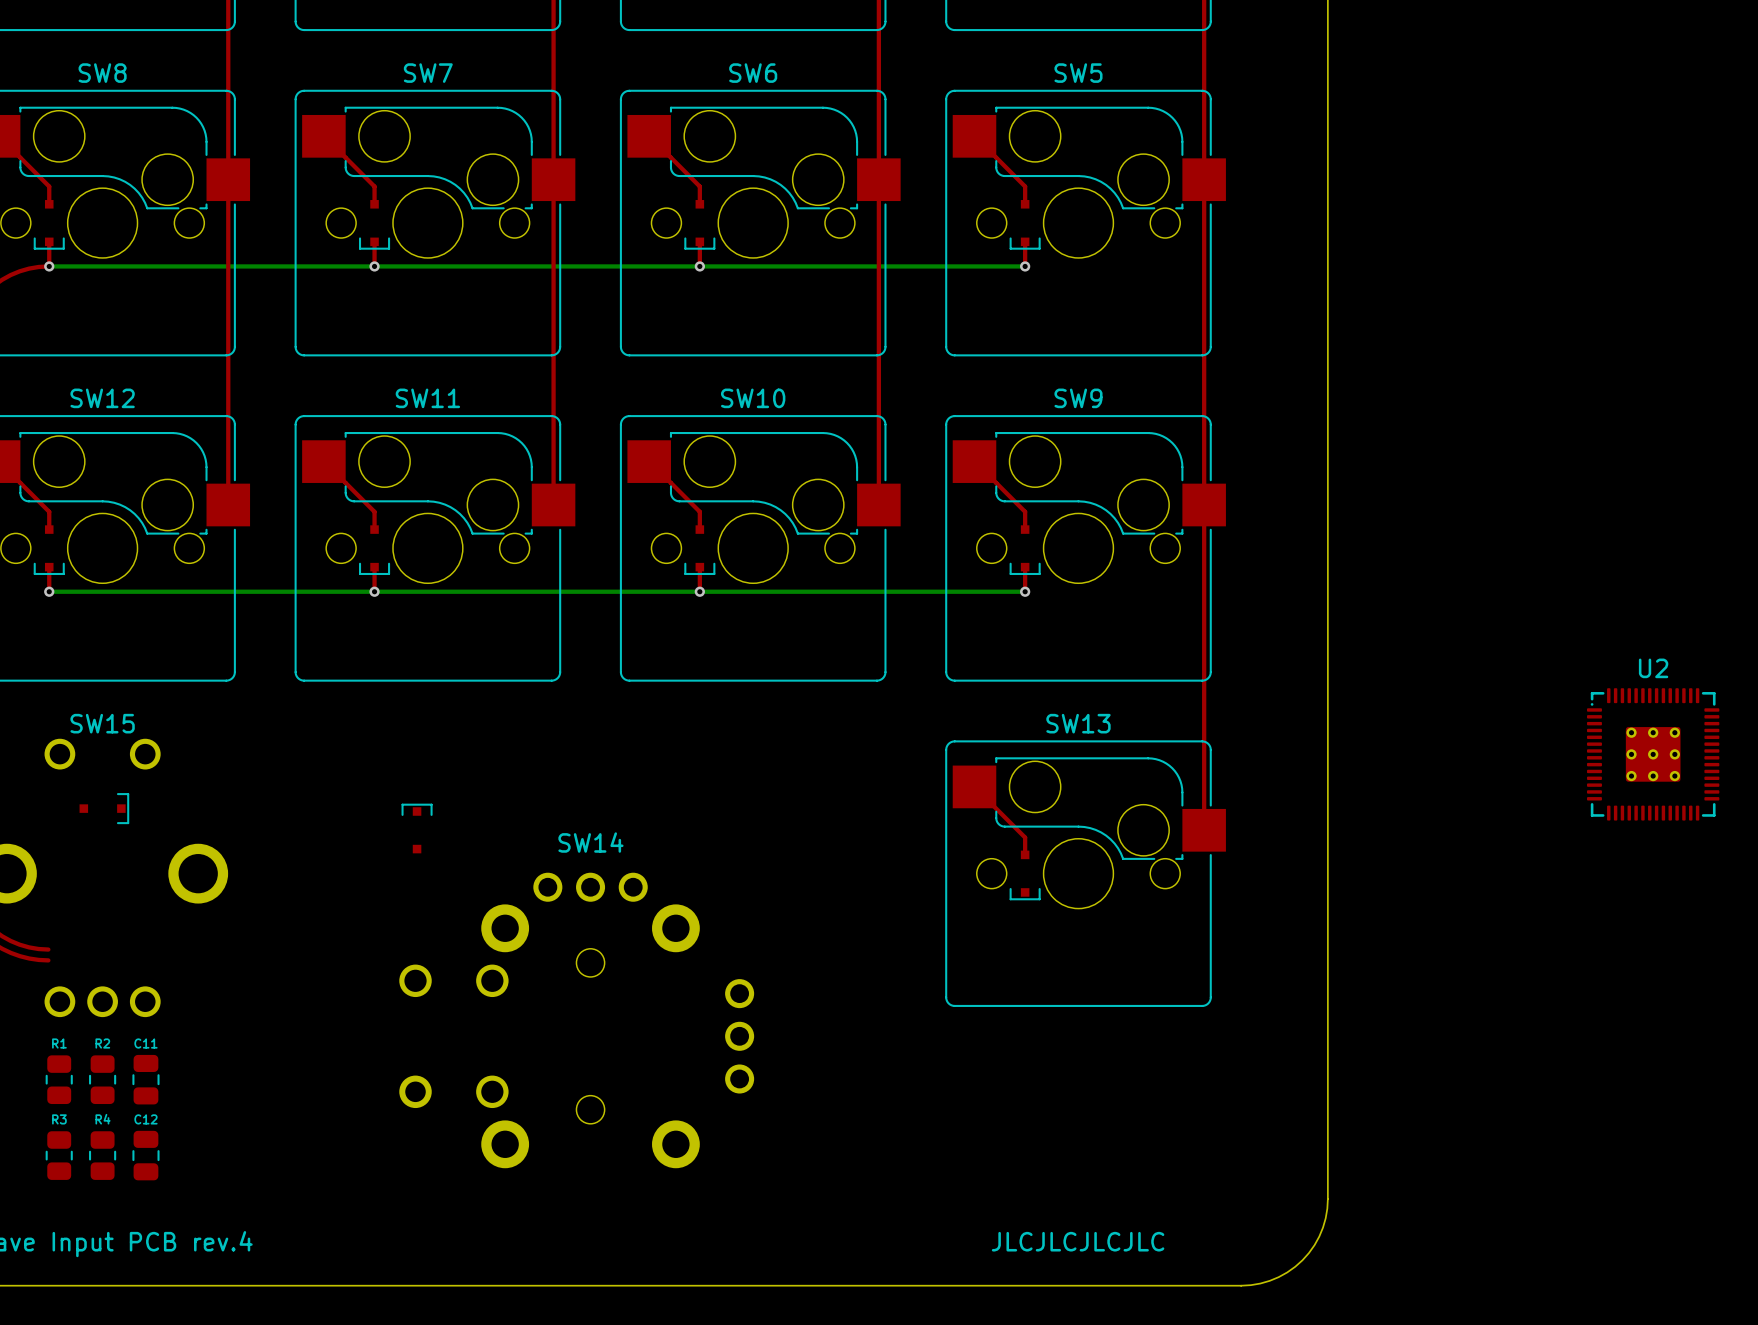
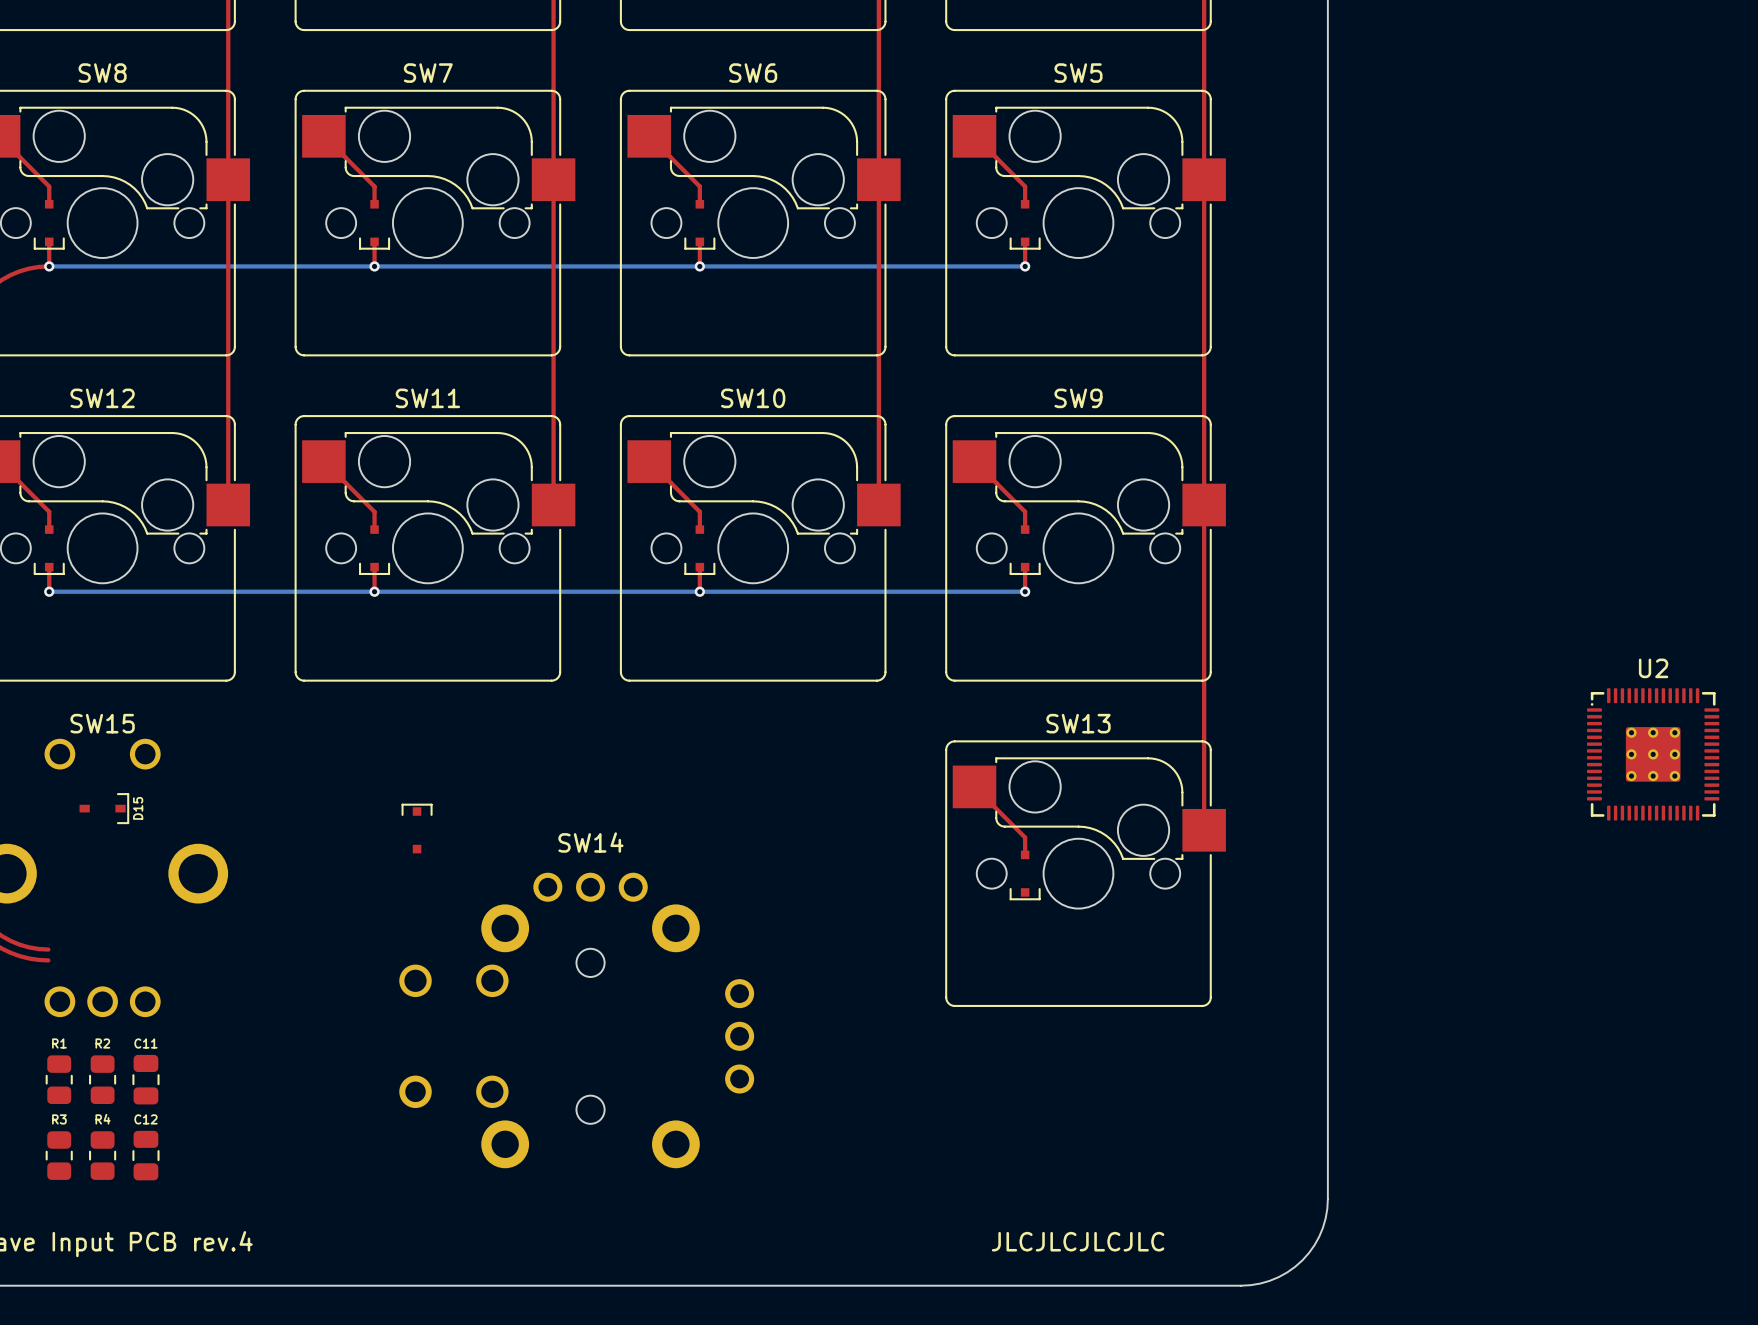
part: (104, 808) -> none
D15: none -> (104, 808)

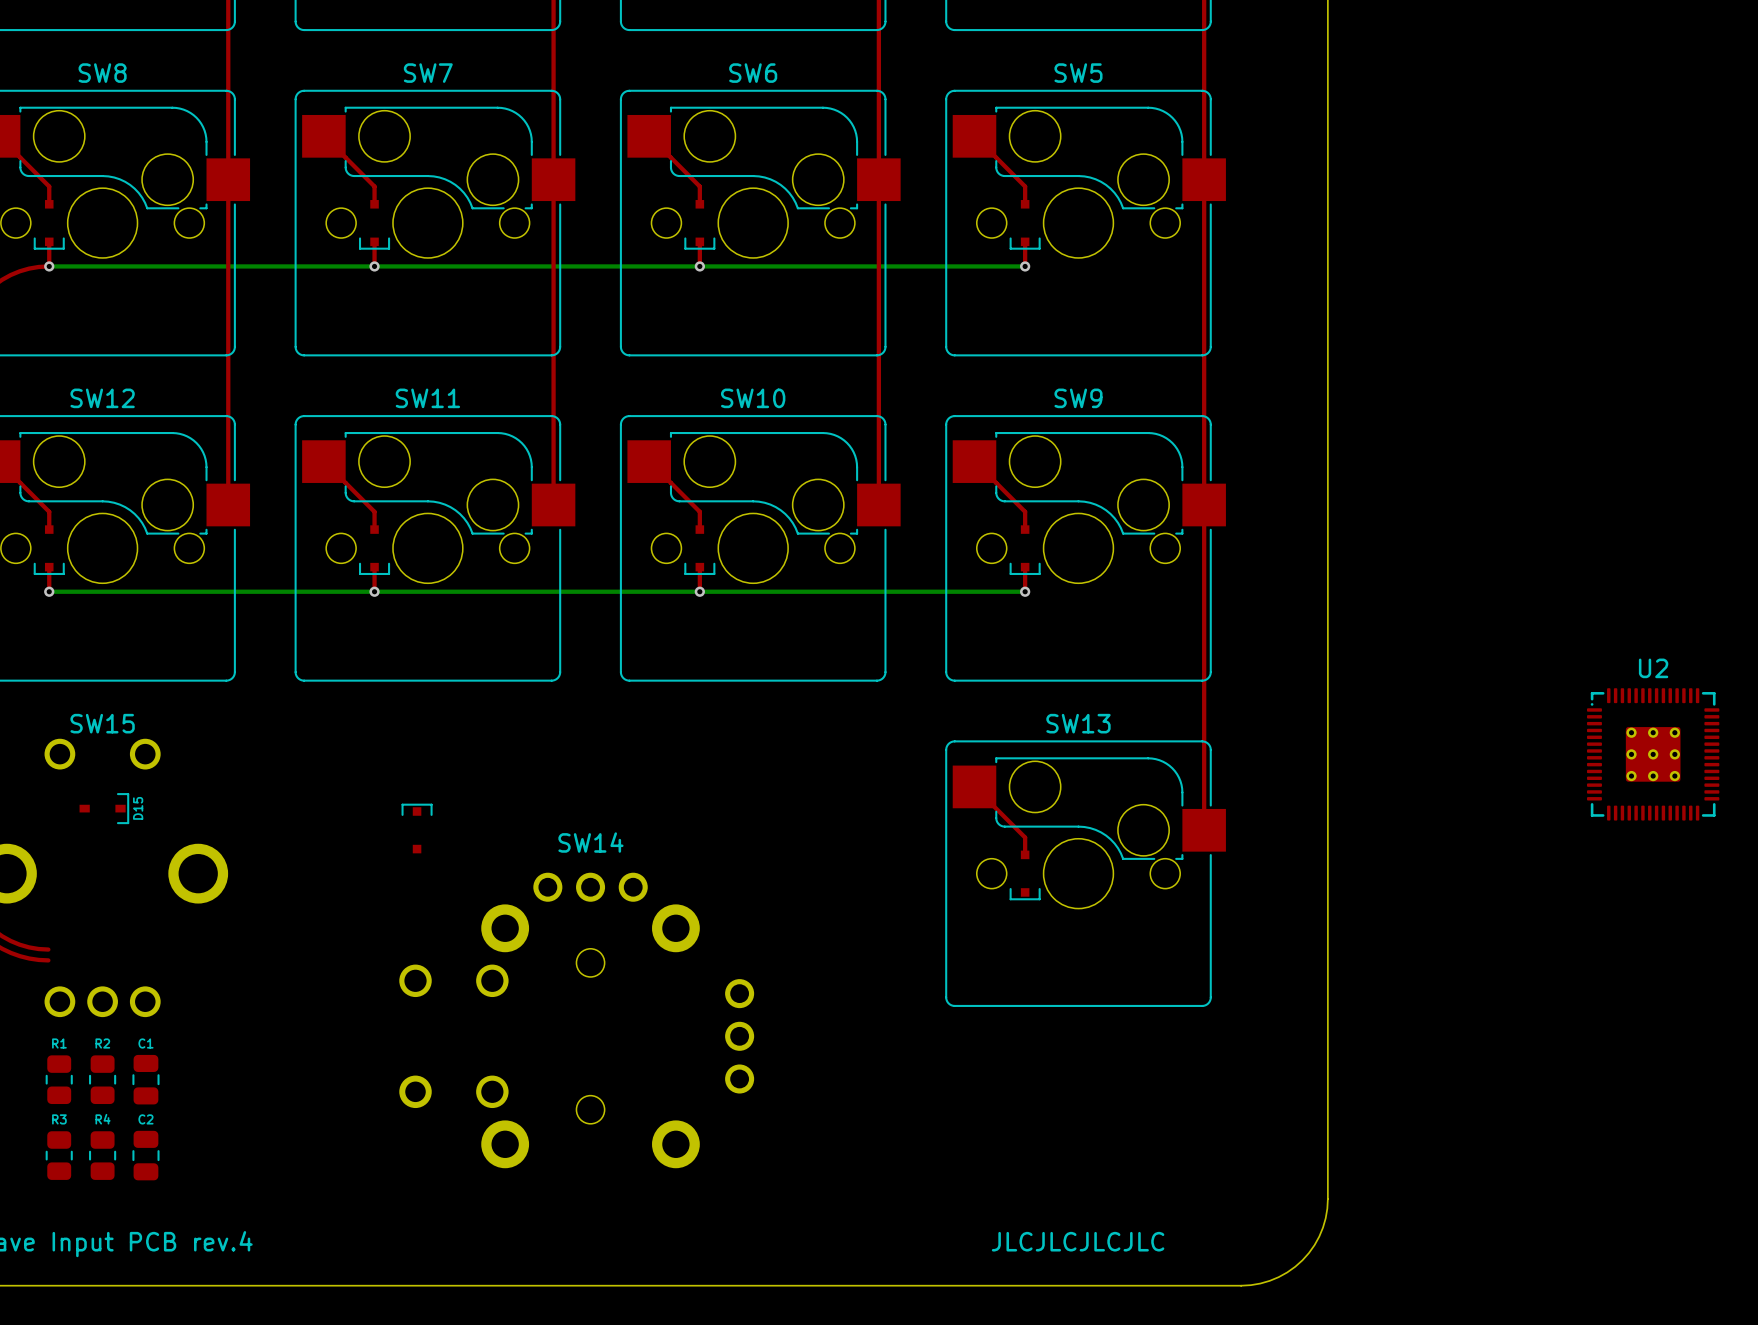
C11 name: C11 (145, 1043) -> C1 (145, 1043)
C12 name: C12 (145, 1119) -> C2 (145, 1119)

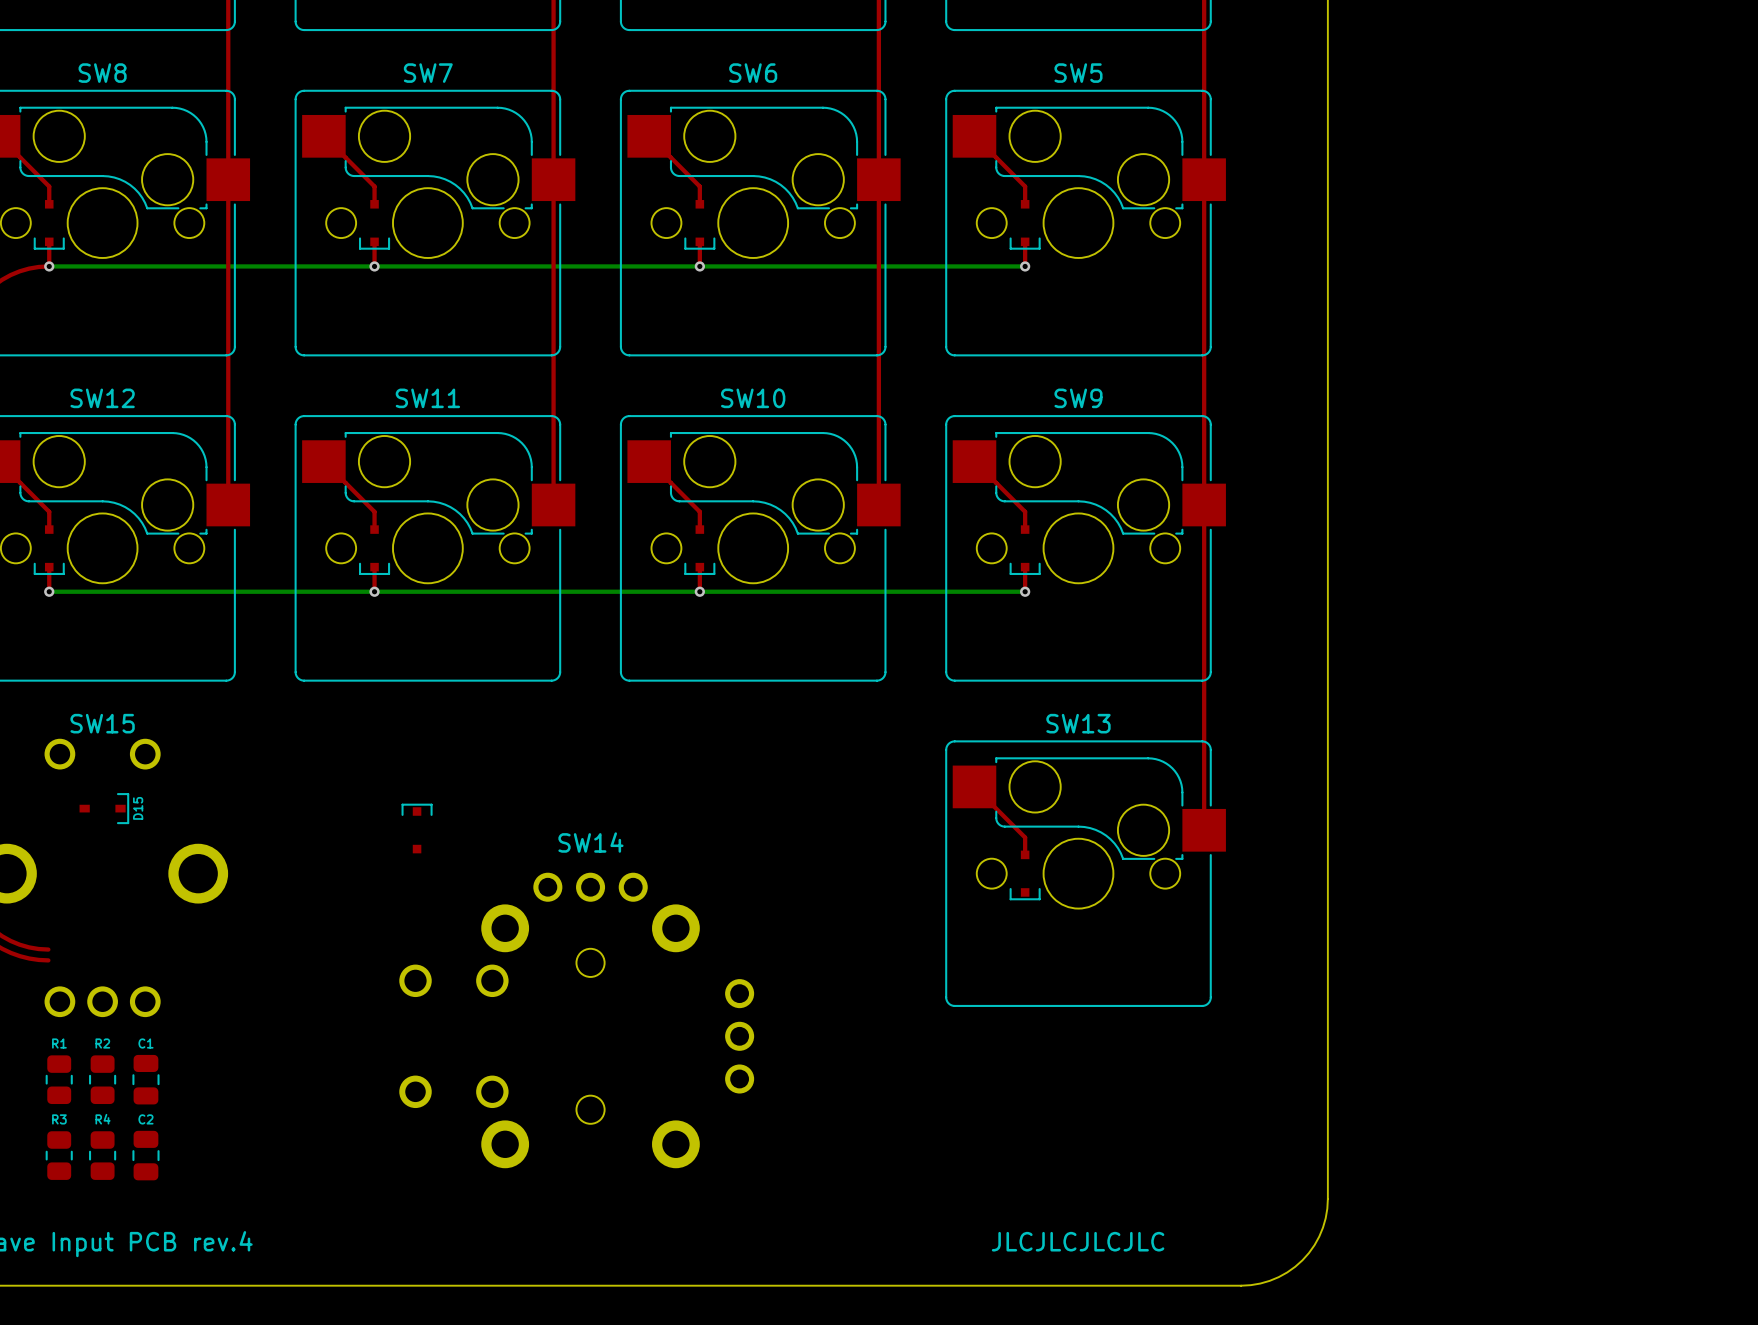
U2: (1653, 754) -> none

